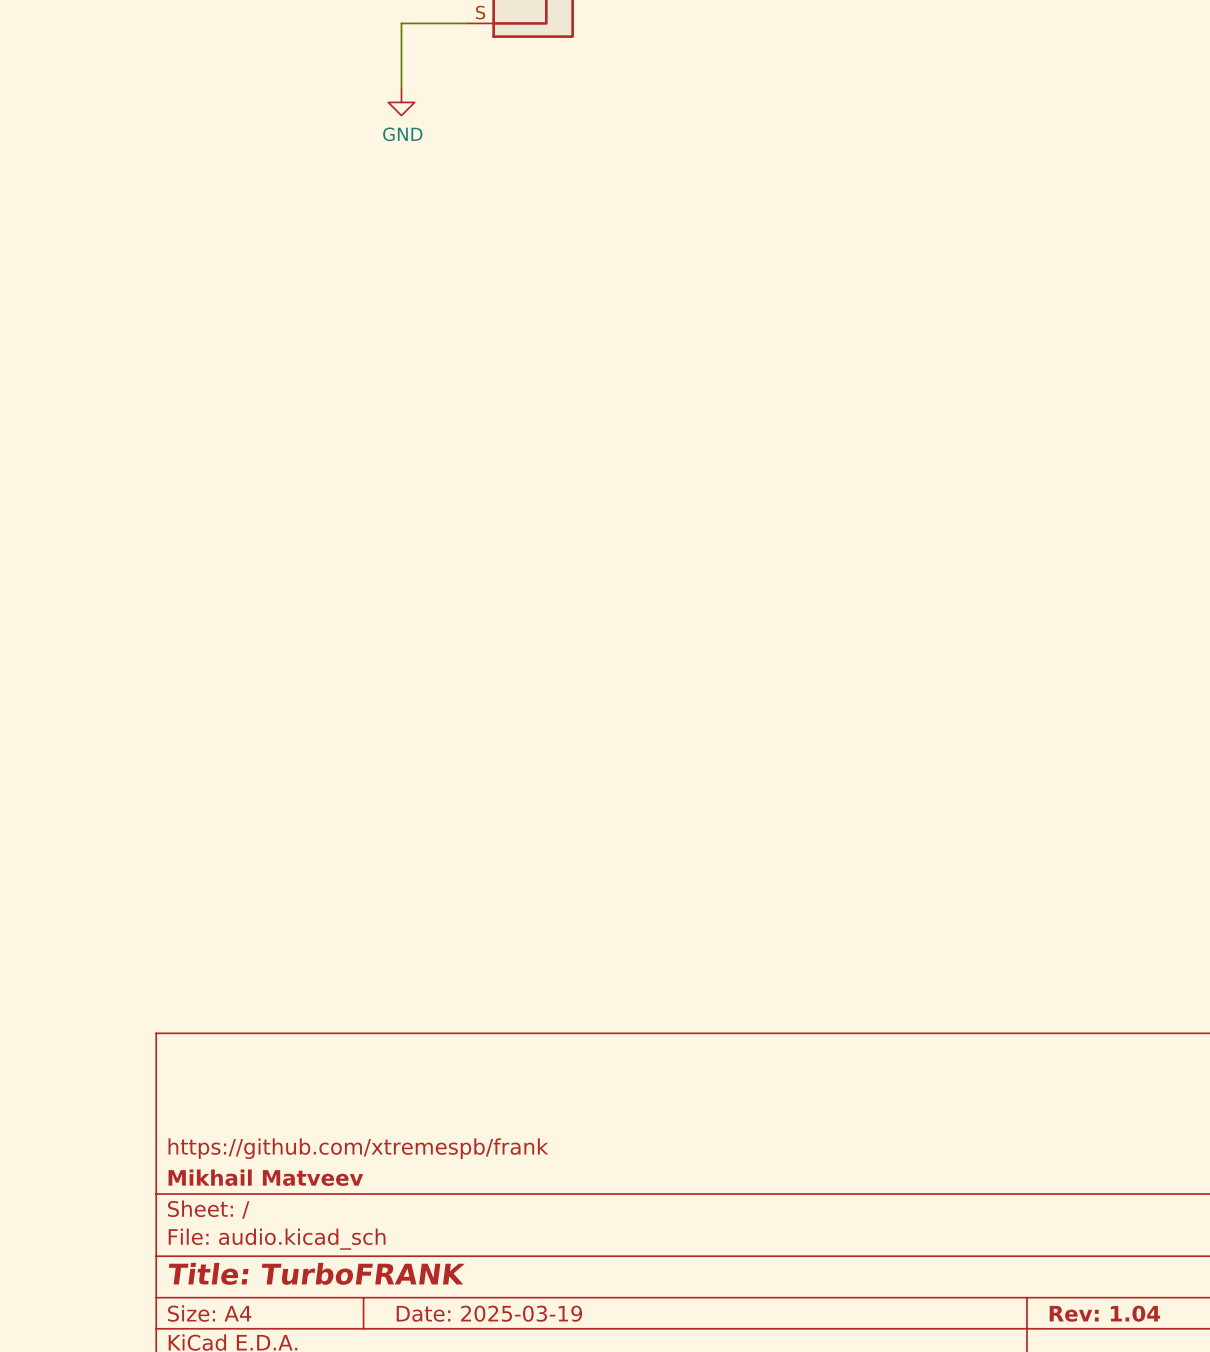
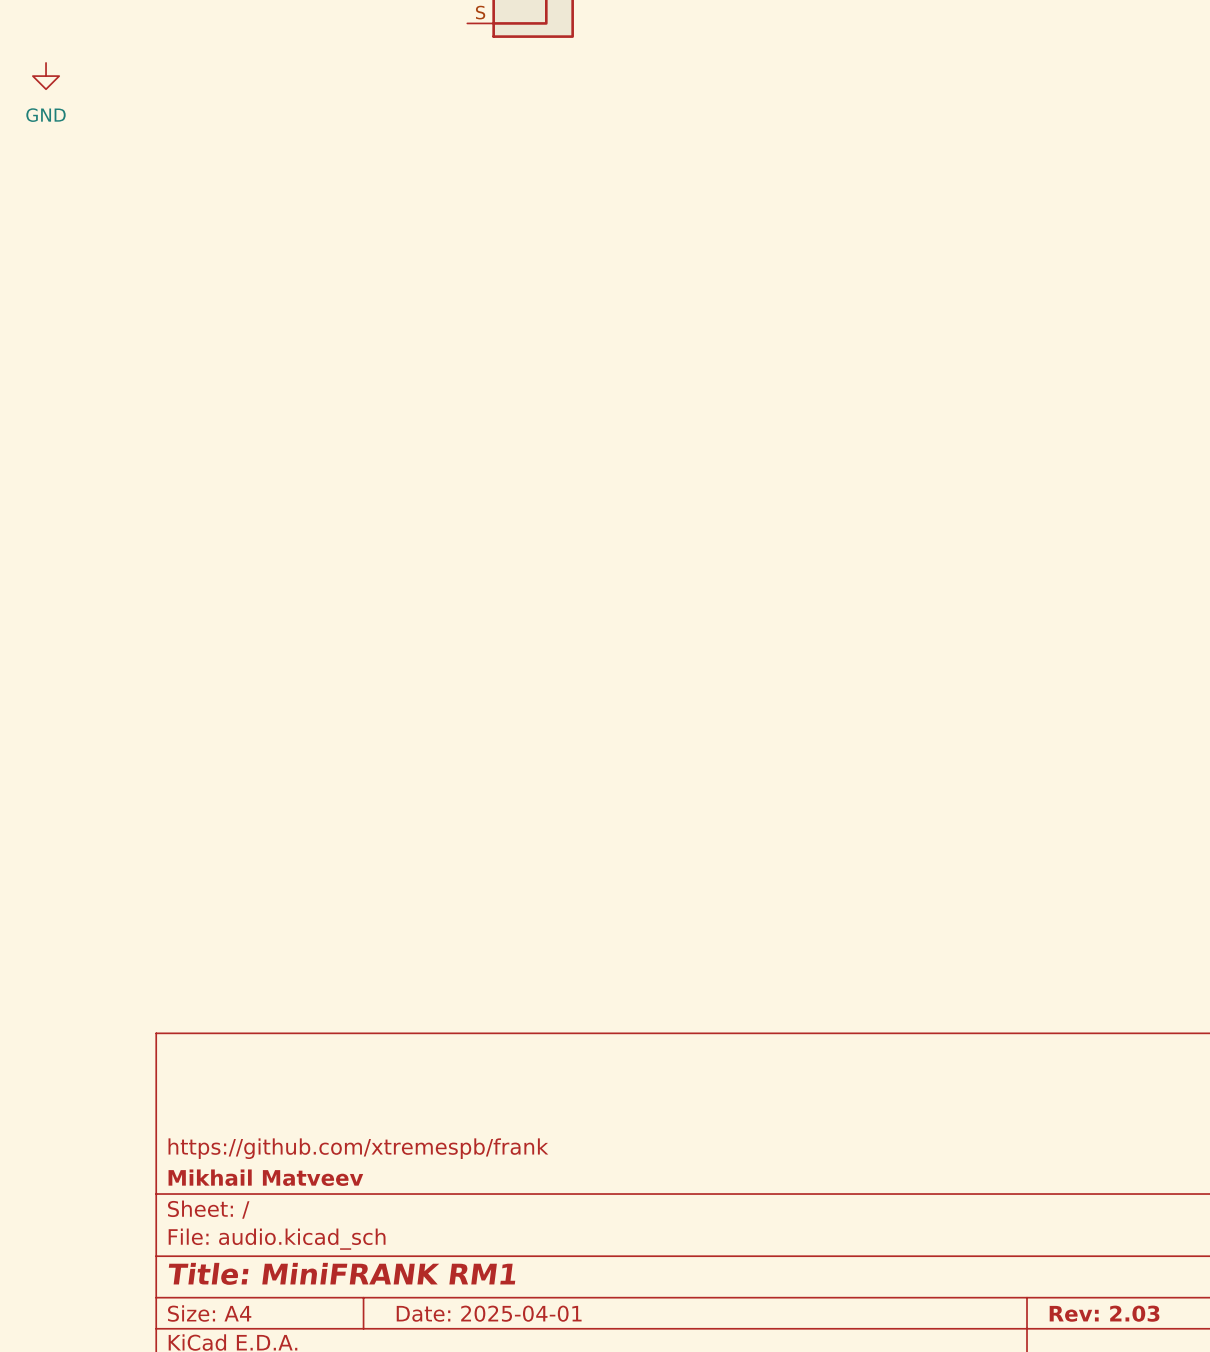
wire: (467, 23) (401, 23) (401, 89) -> none
power symbol: none -> GND (46, 76)
power symbol: GND (401, 102) -> none
title block: Title: TurboFRANK (316, 1273) -> Title: MiniFRANK RM1 (342, 1273)
title block: Date: 2025-03-19 (489, 1313) -> Date: 2025-04-01 (489, 1313)
title block: Rev: 1.04 (1104, 1313) -> Rev: 2.03 (1104, 1313)

